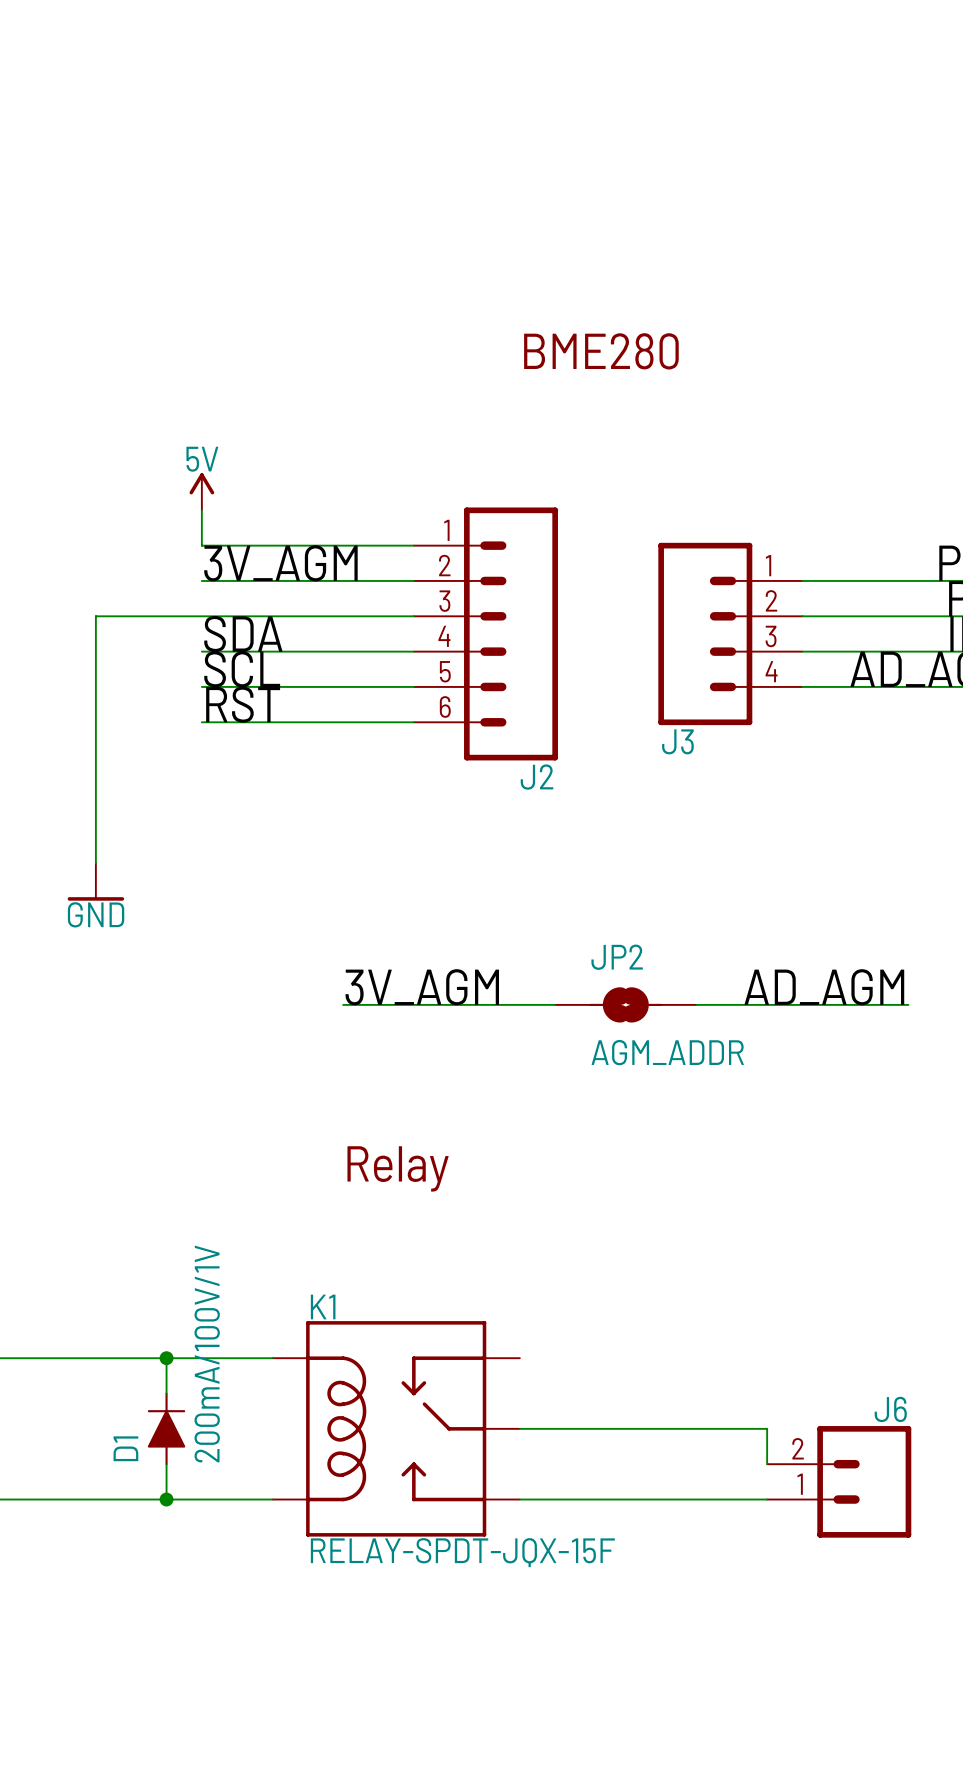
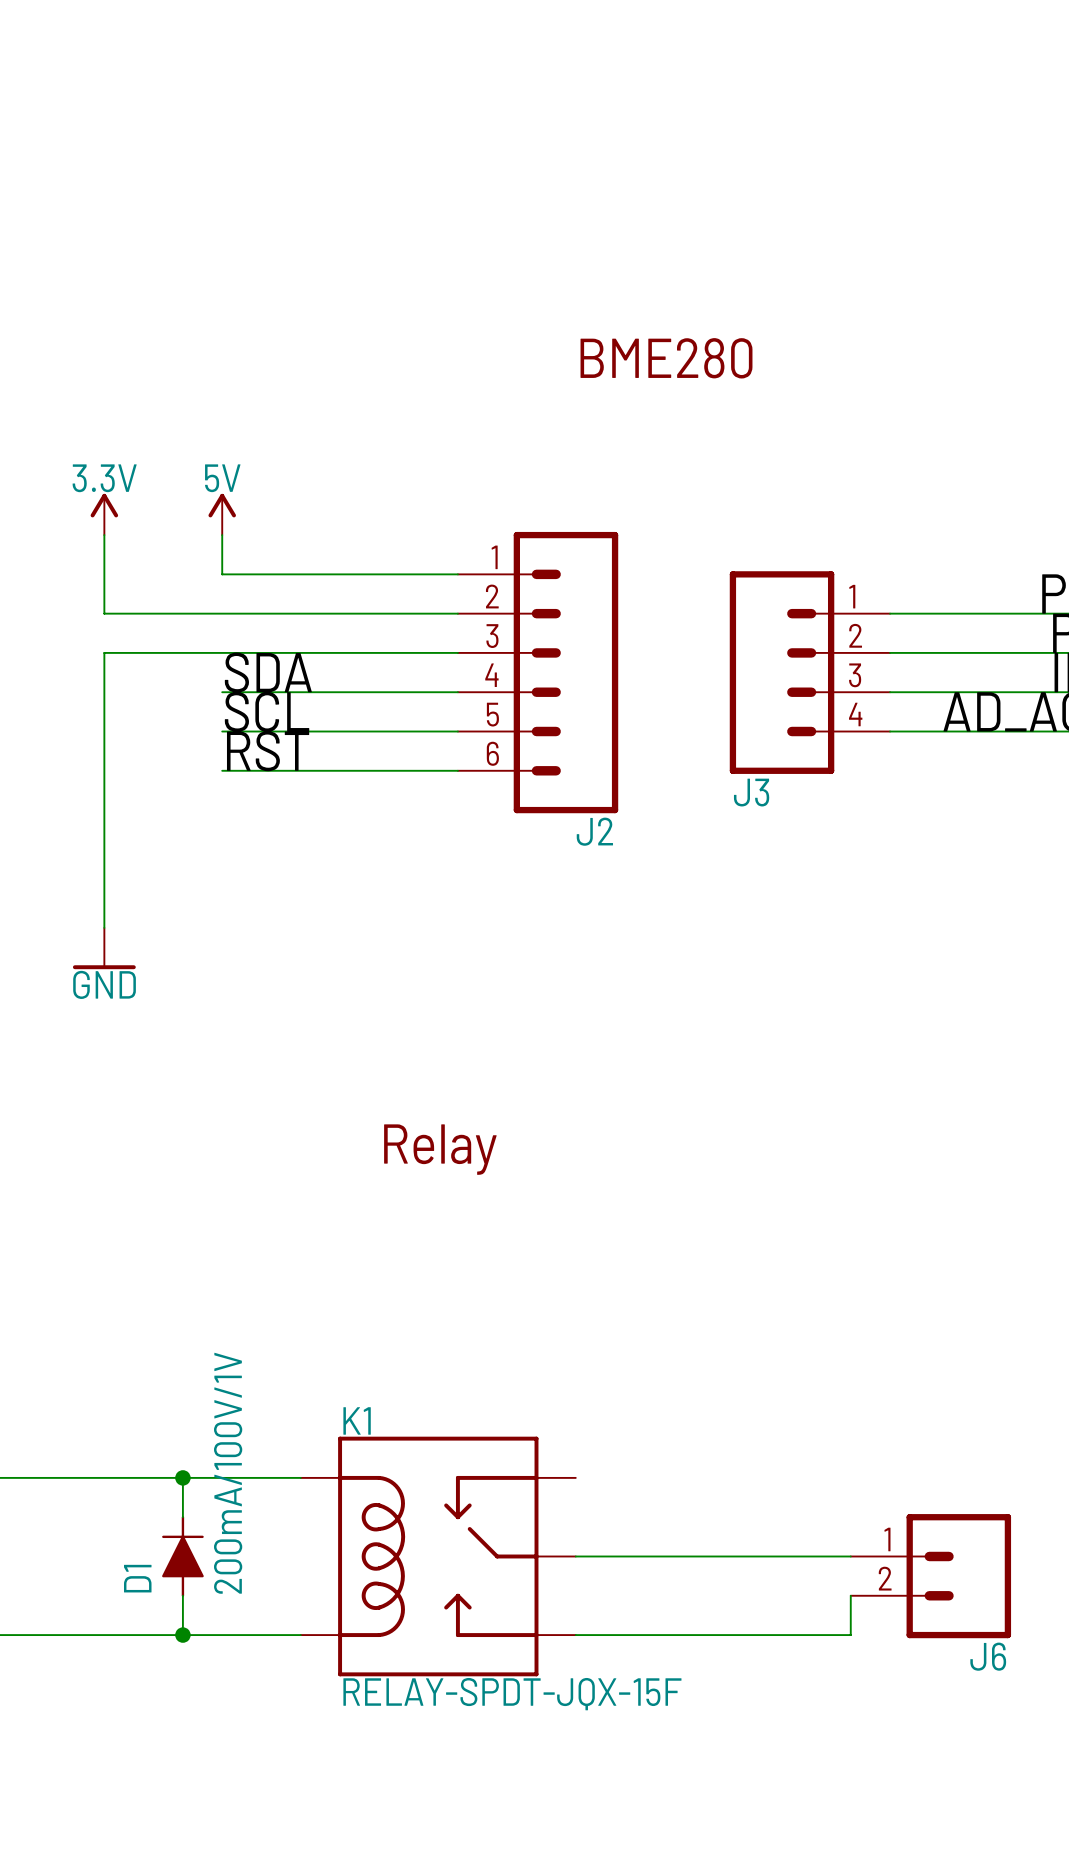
power symbol: none -> 3.3V (104, 514)
wire: none -> (104, 535) (104, 613) (222, 613)
label: 3V_AGM (280, 563) -> none
label: 3V_AGM (422, 987) -> none
label: AD_AGM (824, 987) -> none
wire: (343, 1004) (555, 1004) -> none
JP2: AGM_ADDR (625, 1004) -> none
wire: (696, 1004) (908, 1004) -> none
text position: Relay (398, 1168) -> Relay (440, 1149)
wire: (767, 1428) (767, 1464) -> (850, 1635) (850, 1595)
J6 flip: as is (864, 1481) -> up-down (958, 1576)

